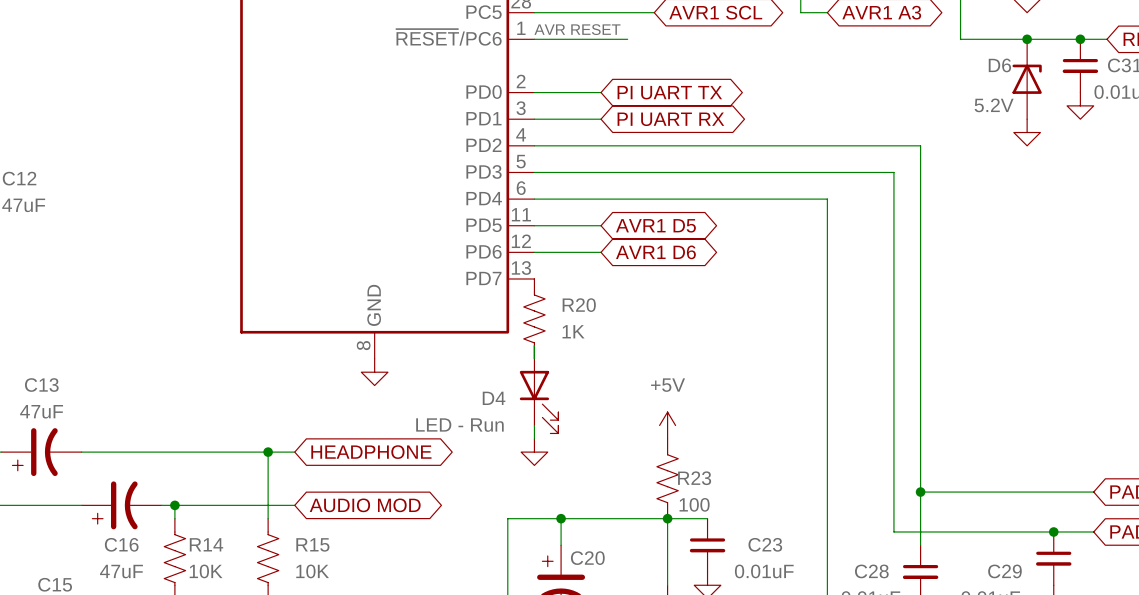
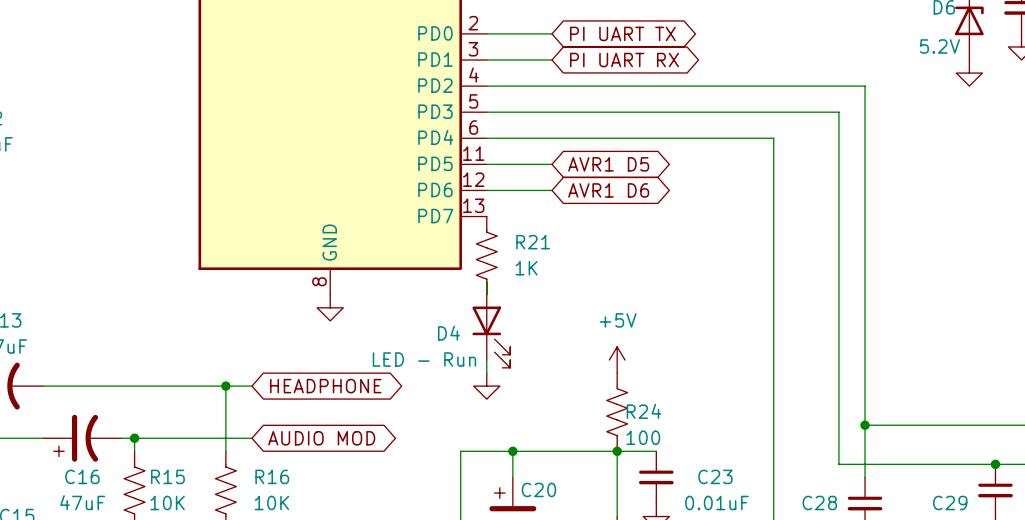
R20 name: R20 (579, 305) -> R21 (533, 242)
R23 name: R23 (694, 478) -> R24 (643, 411)
R14 name: R14 (206, 544) -> R15 (167, 476)
R15 name: R15 (312, 544) -> R16 (272, 476)

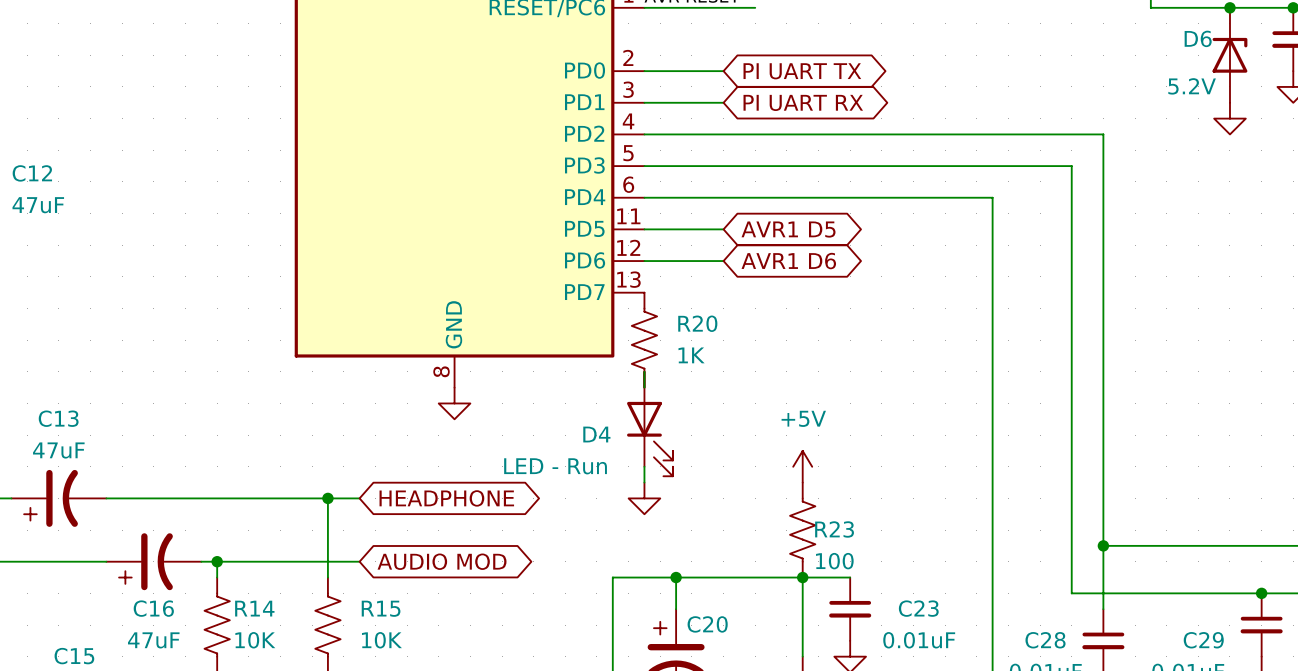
R21 name: R21 (533, 242) -> R20 (697, 323)
R24 name: R24 (643, 411) -> R23 (834, 529)
R15 name: R15 (167, 476) -> R14 (254, 608)
R16 name: R16 (272, 476) -> R15 (381, 608)

